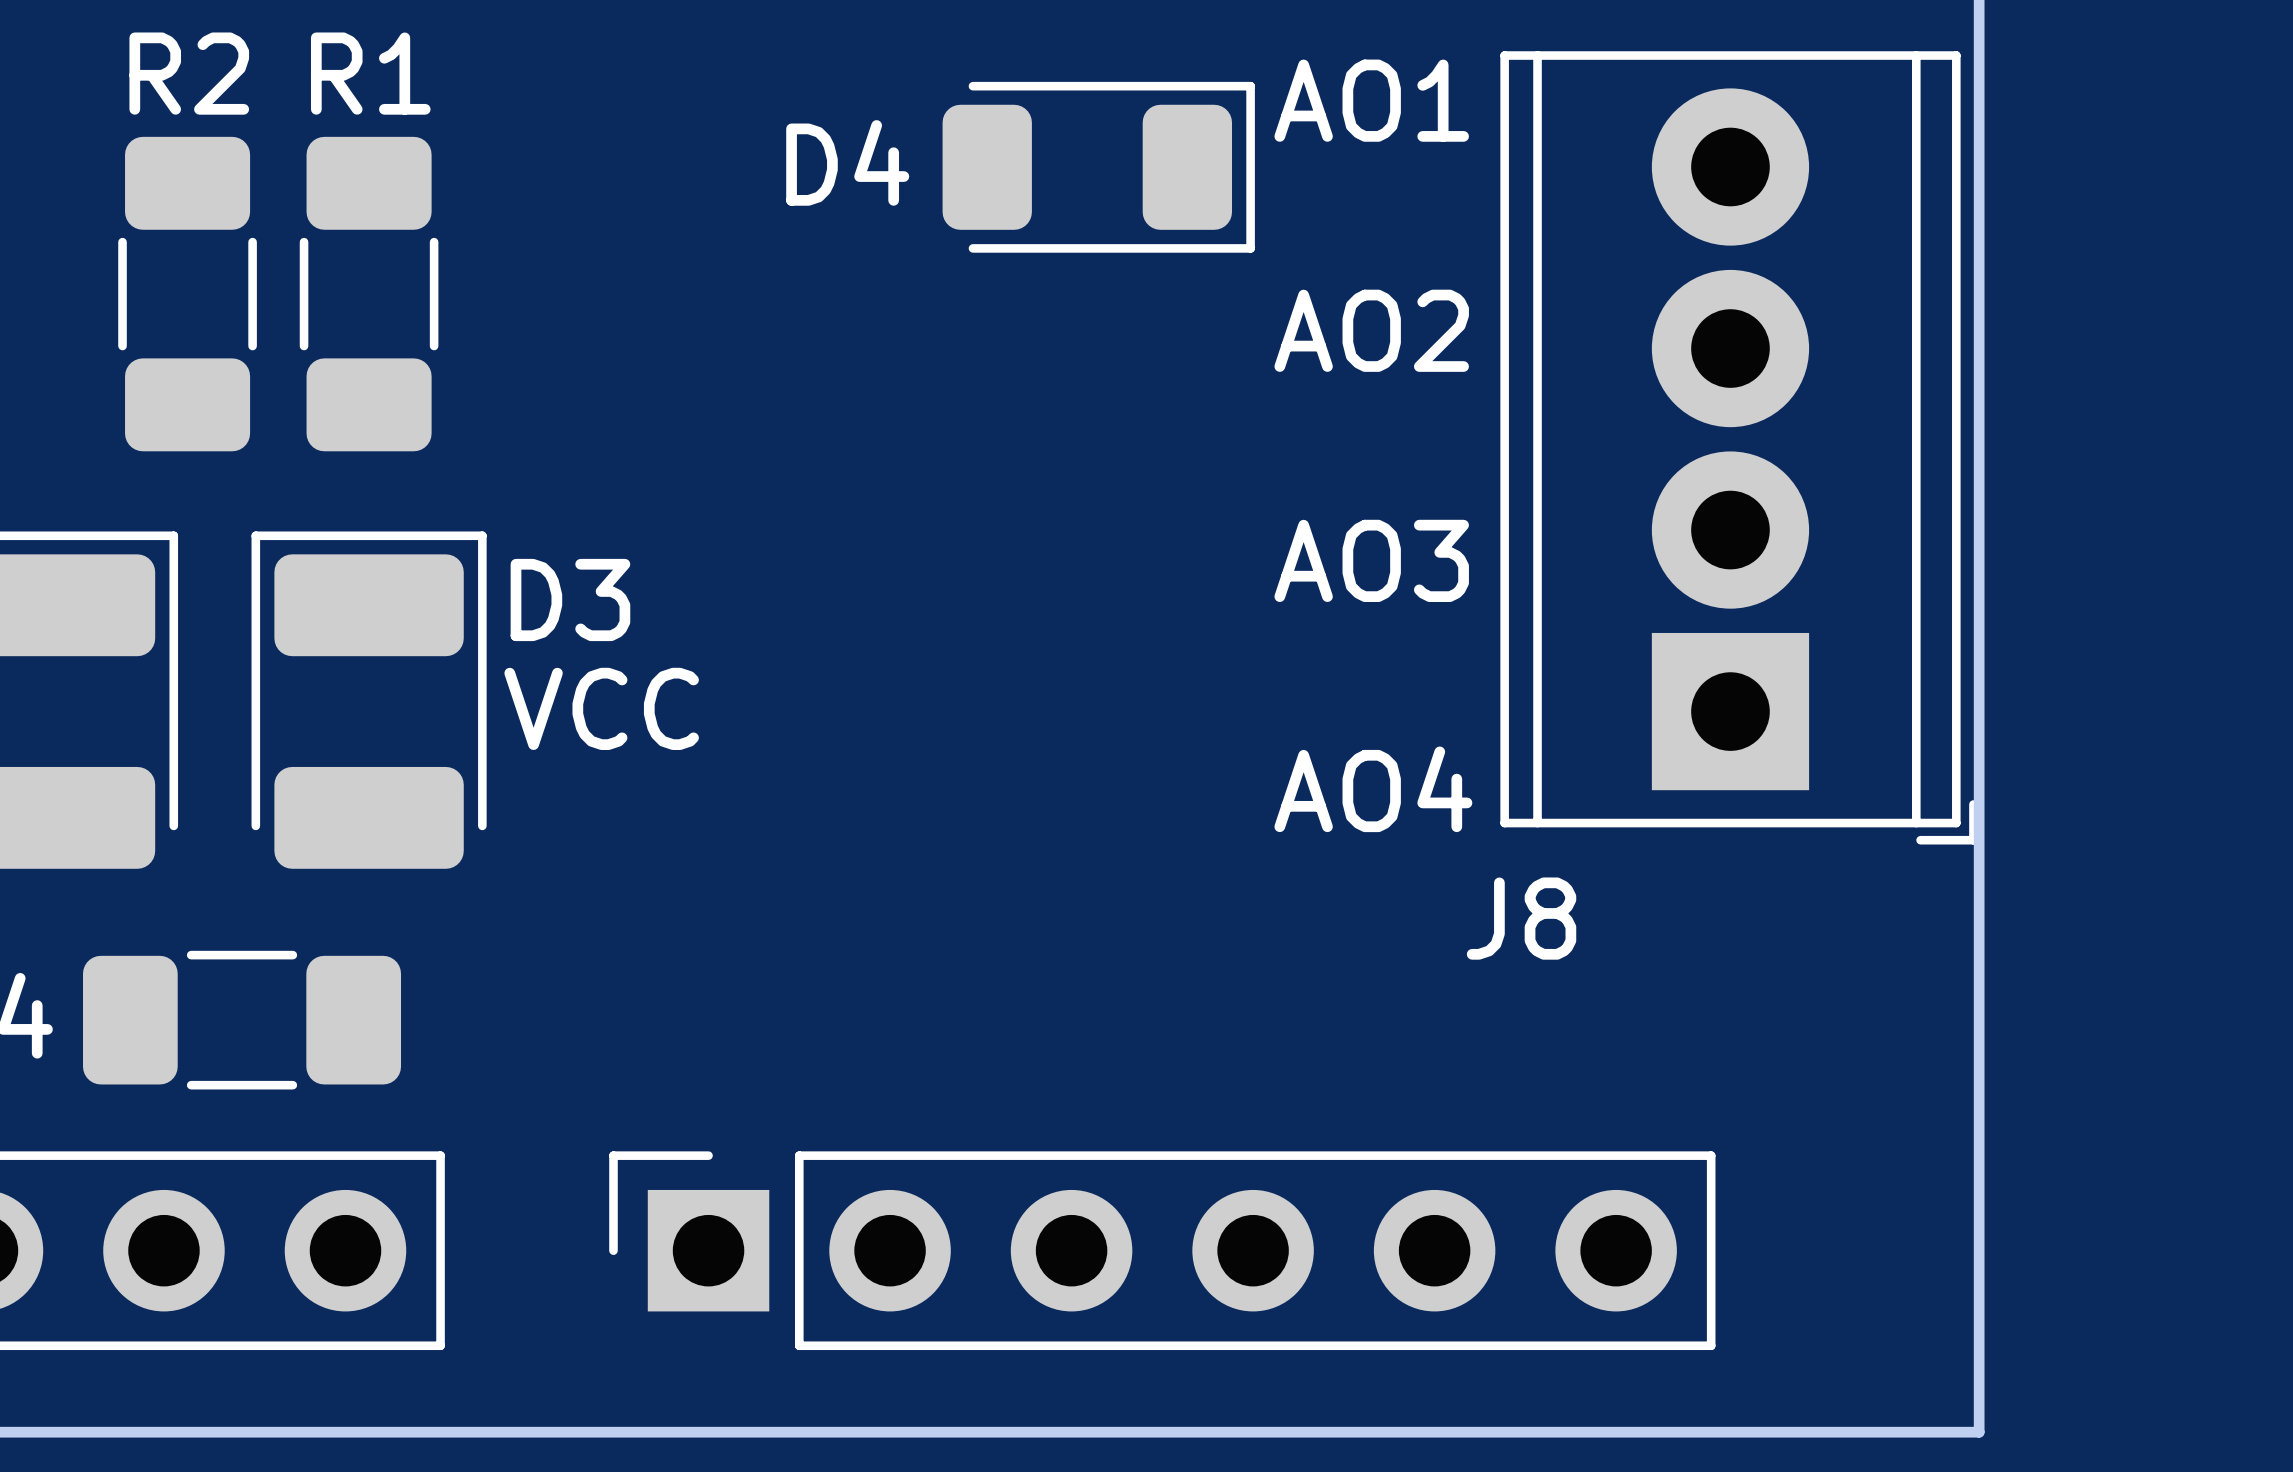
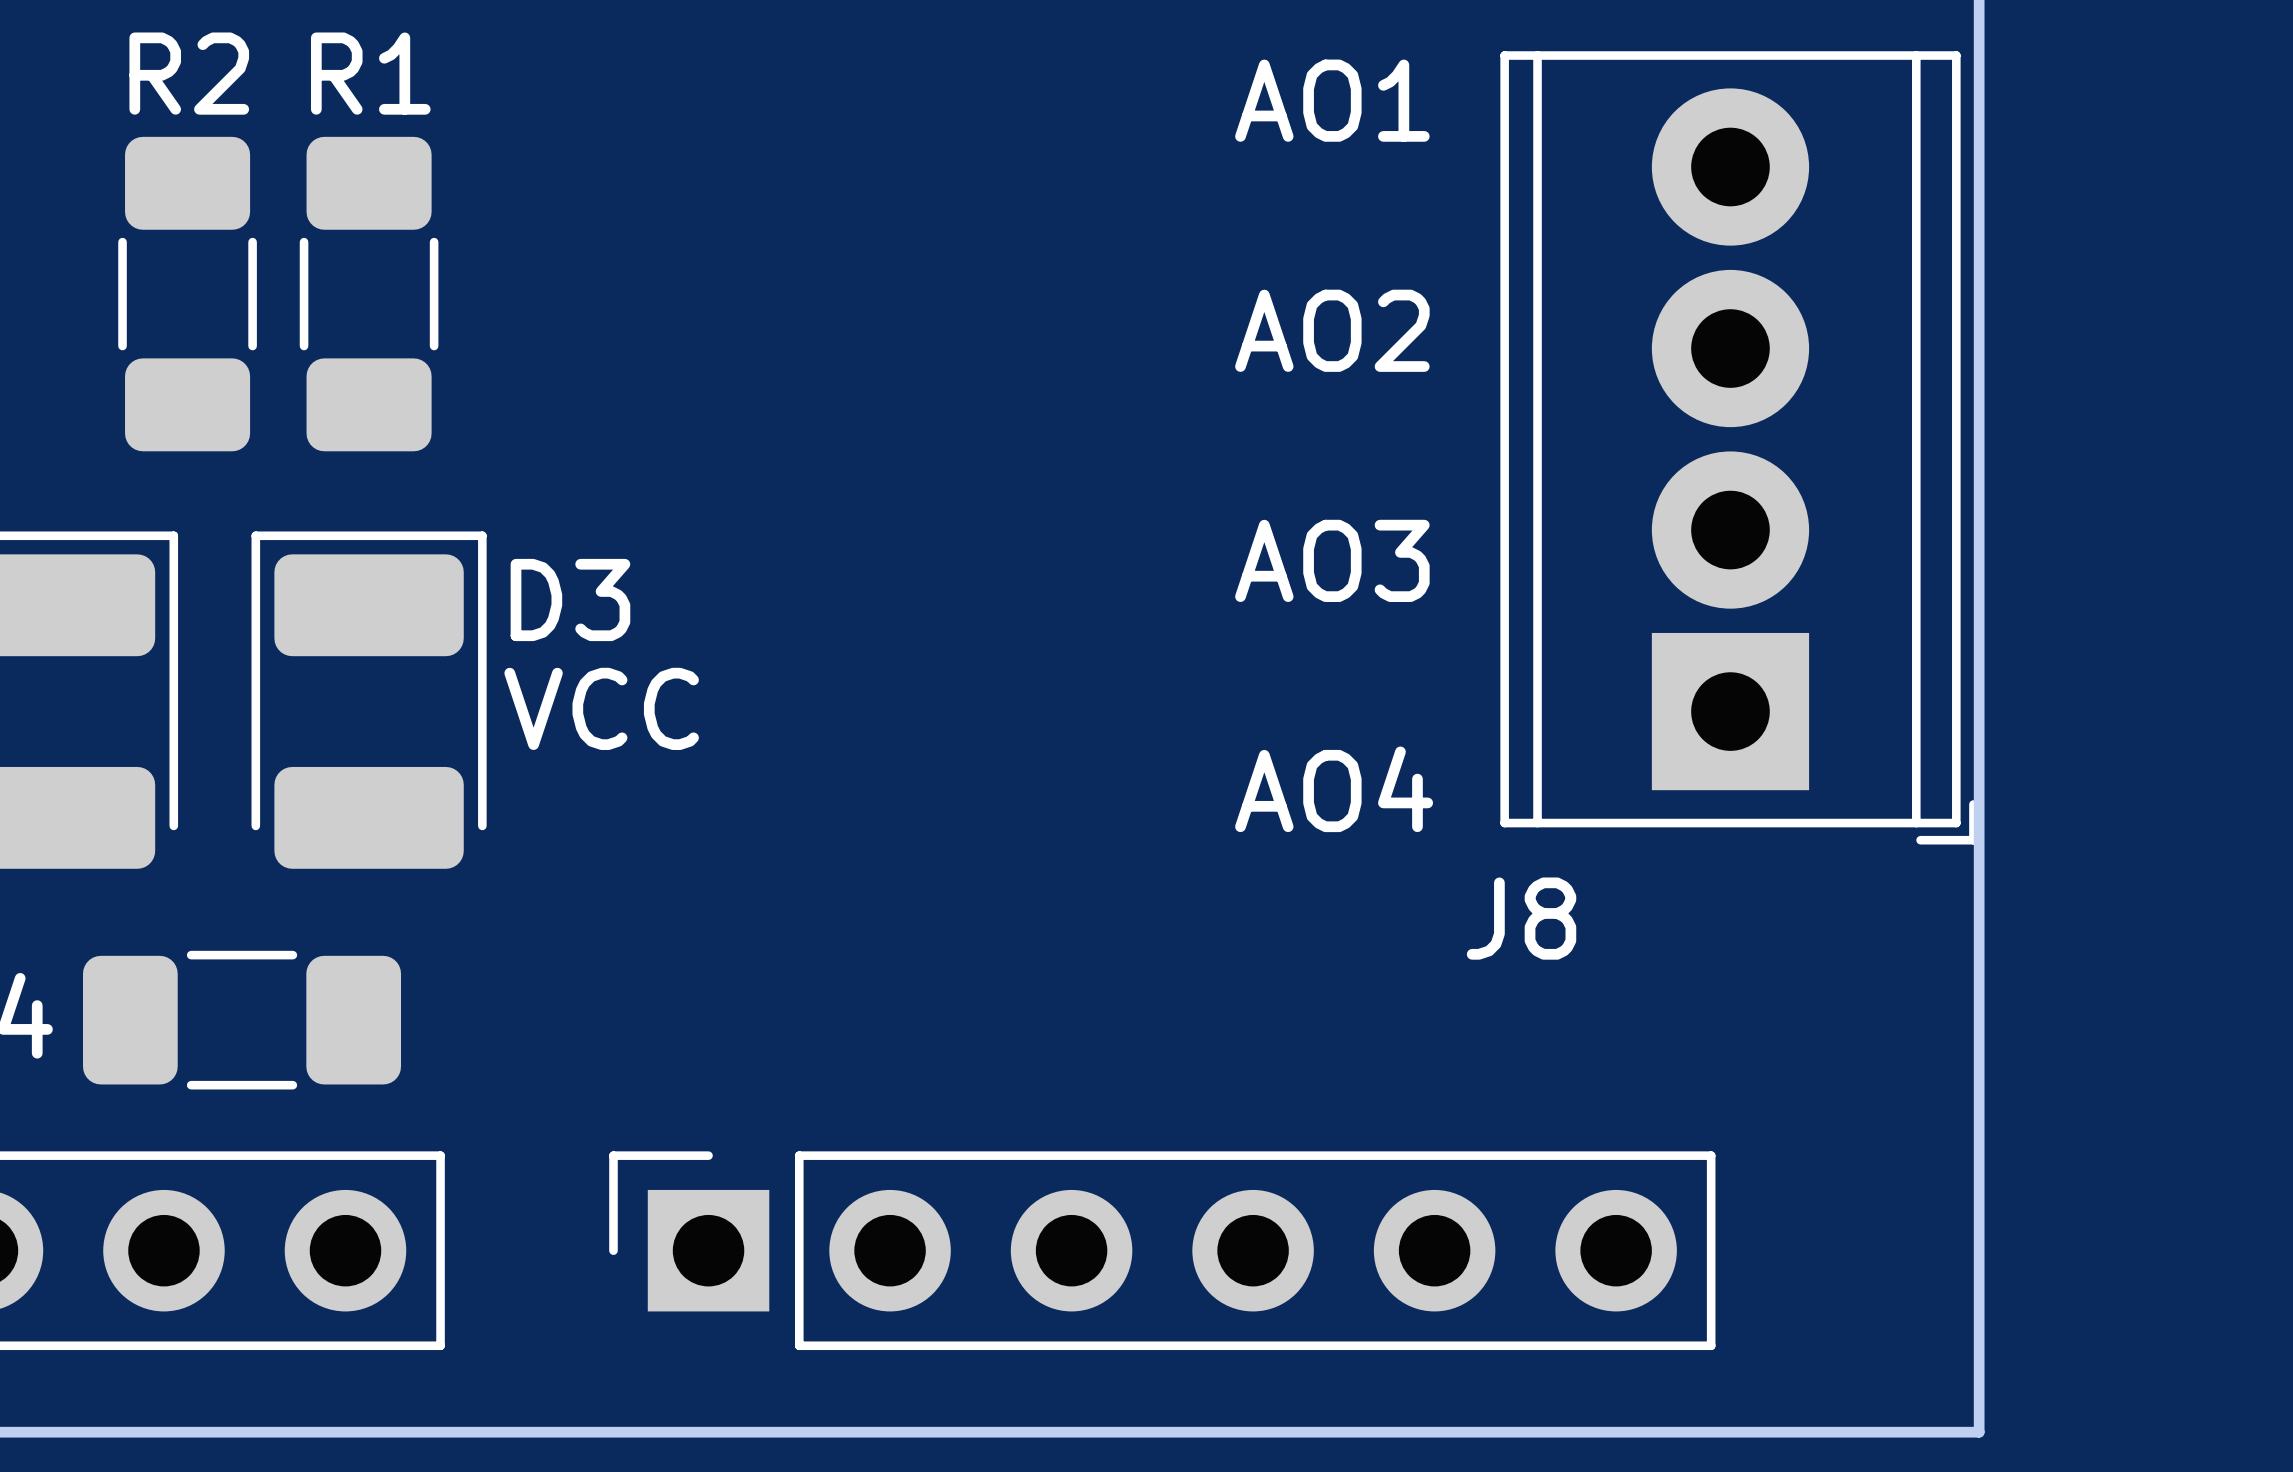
text position: AO1 (1371, 100) -> AO1 (1332, 100)
D4: (1098, 167) -> none
text position: AO2 (1371, 330) -> AO2 (1332, 330)
text position: AO3 (1371, 560) -> AO3 (1332, 560)
text position: AO4 (1373, 789) -> AO4 (1334, 789)

